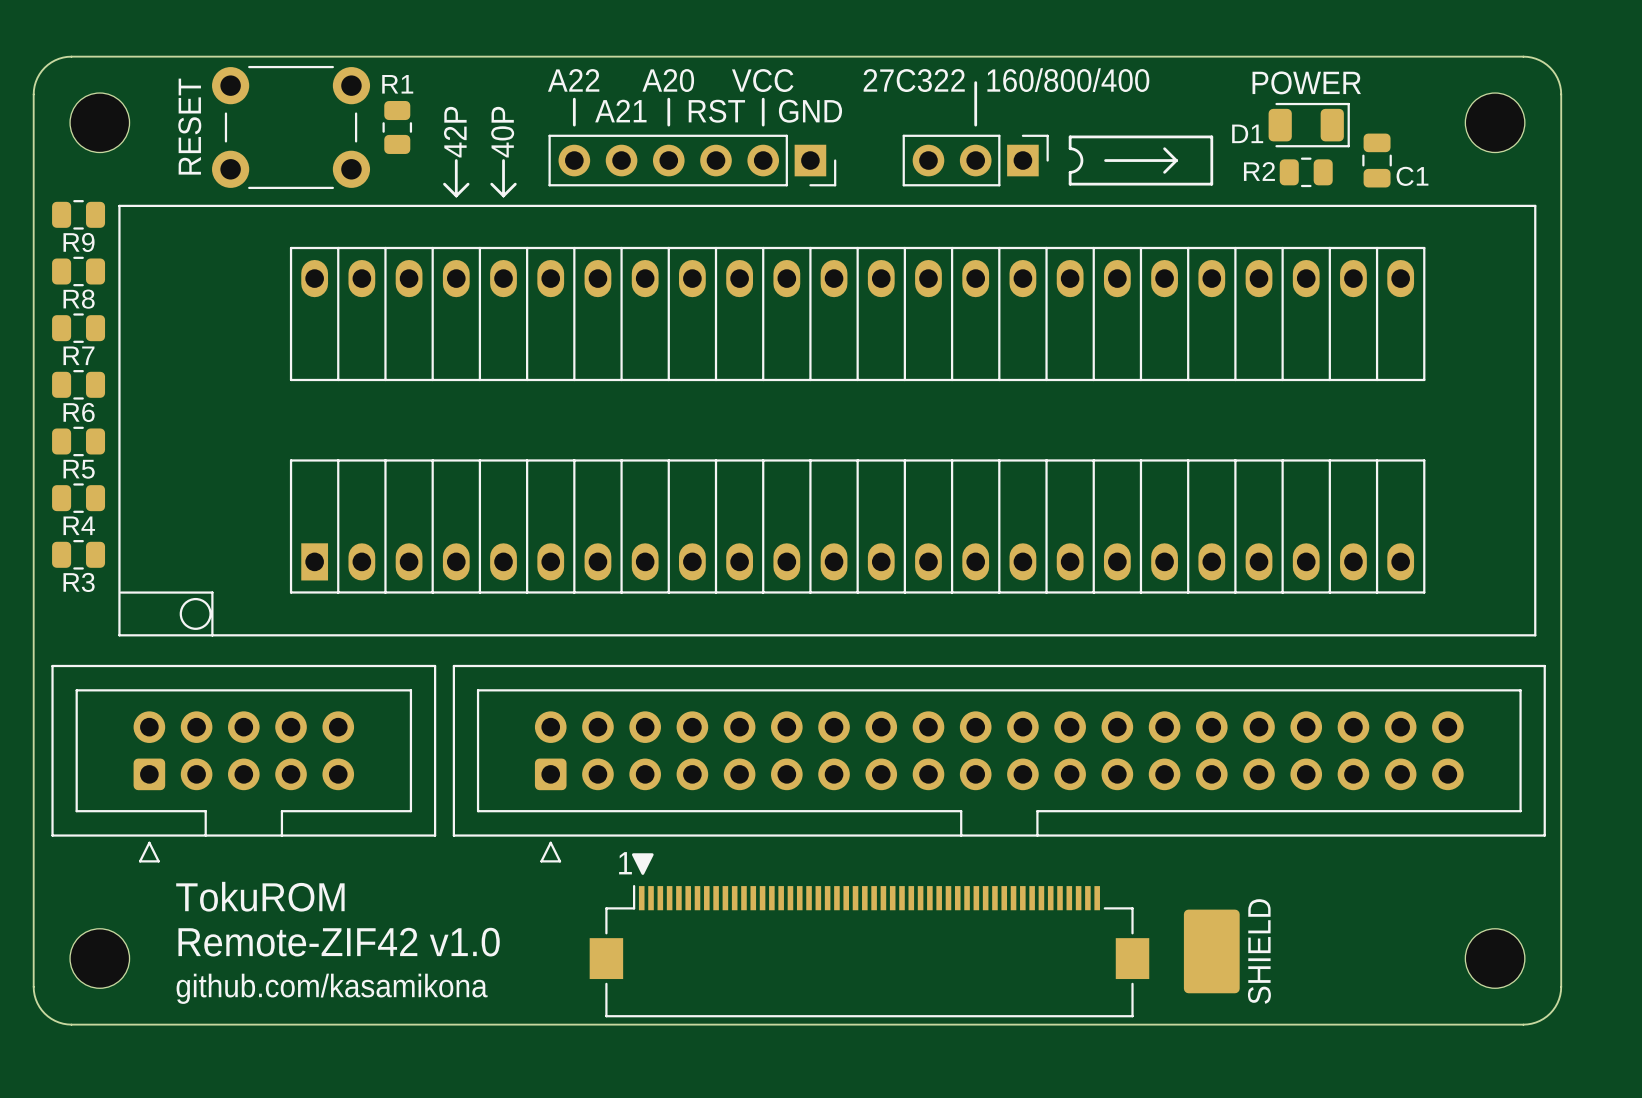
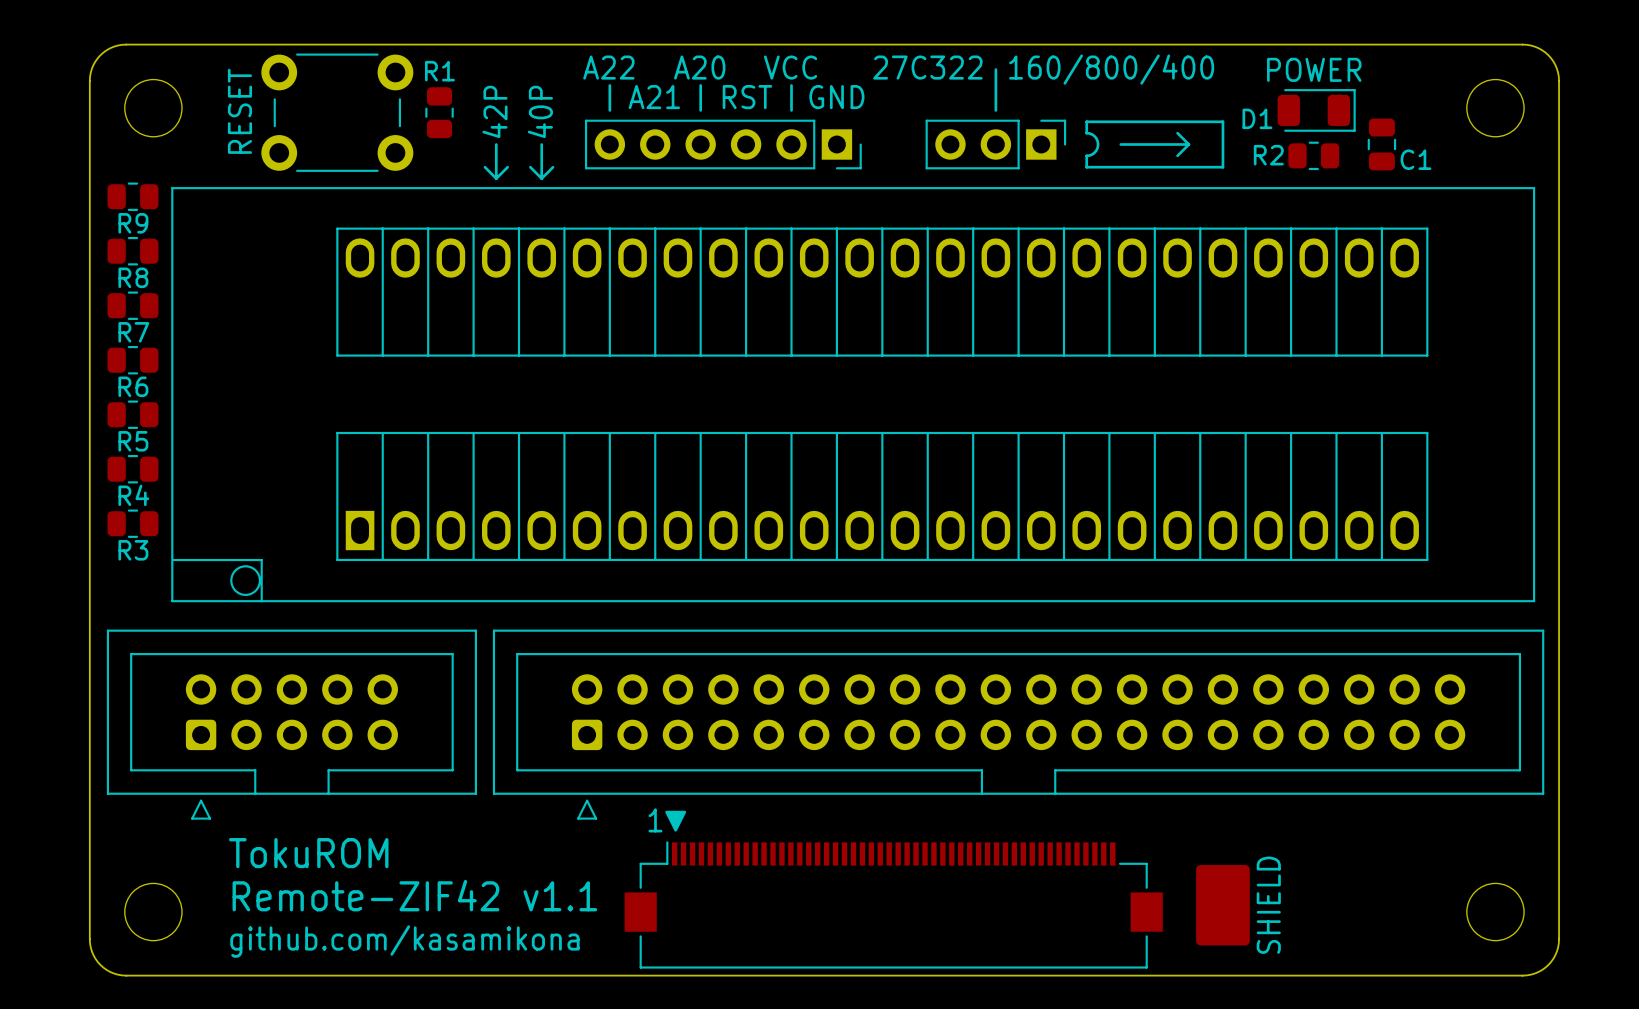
part footprint: [118, 204, 1537, 637] -> [171, 187, 1536, 603]
text: Remote-ZIF42 v1.0 (339, 942) -> Remote-ZIF42 v1.1 (414, 895)

